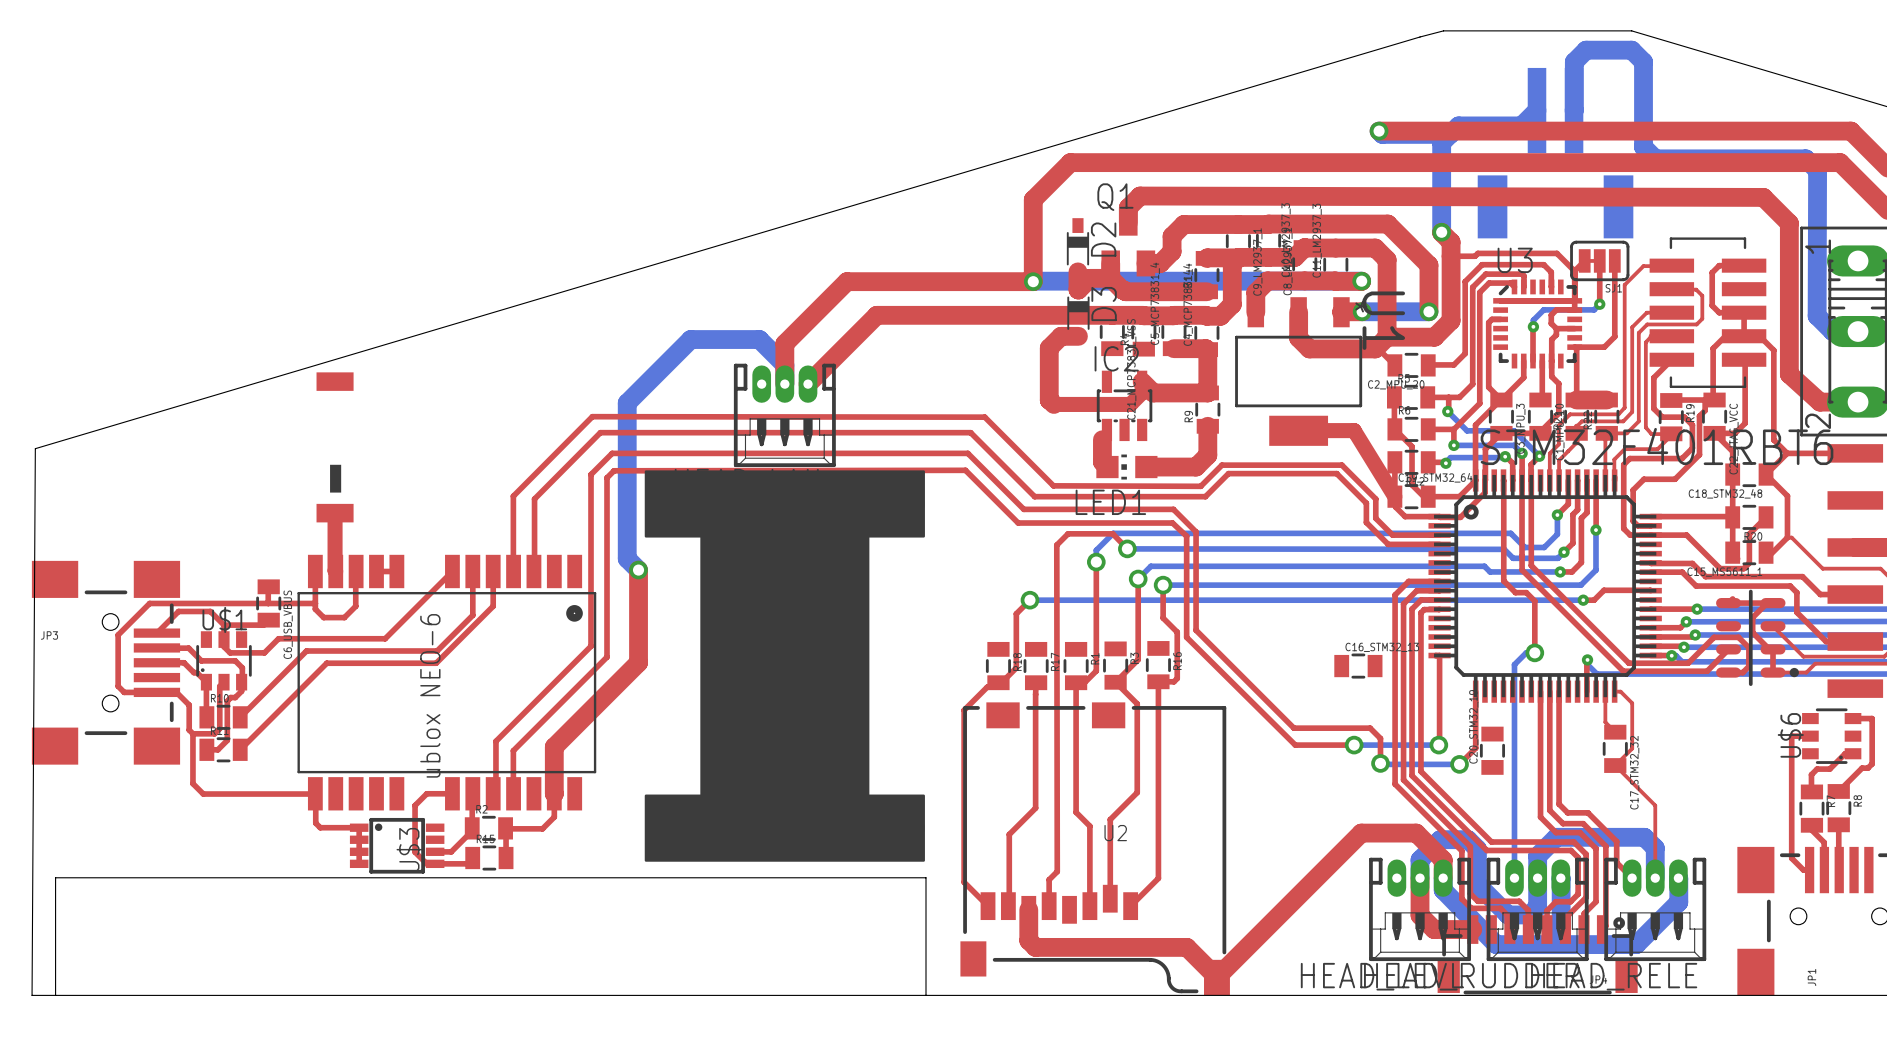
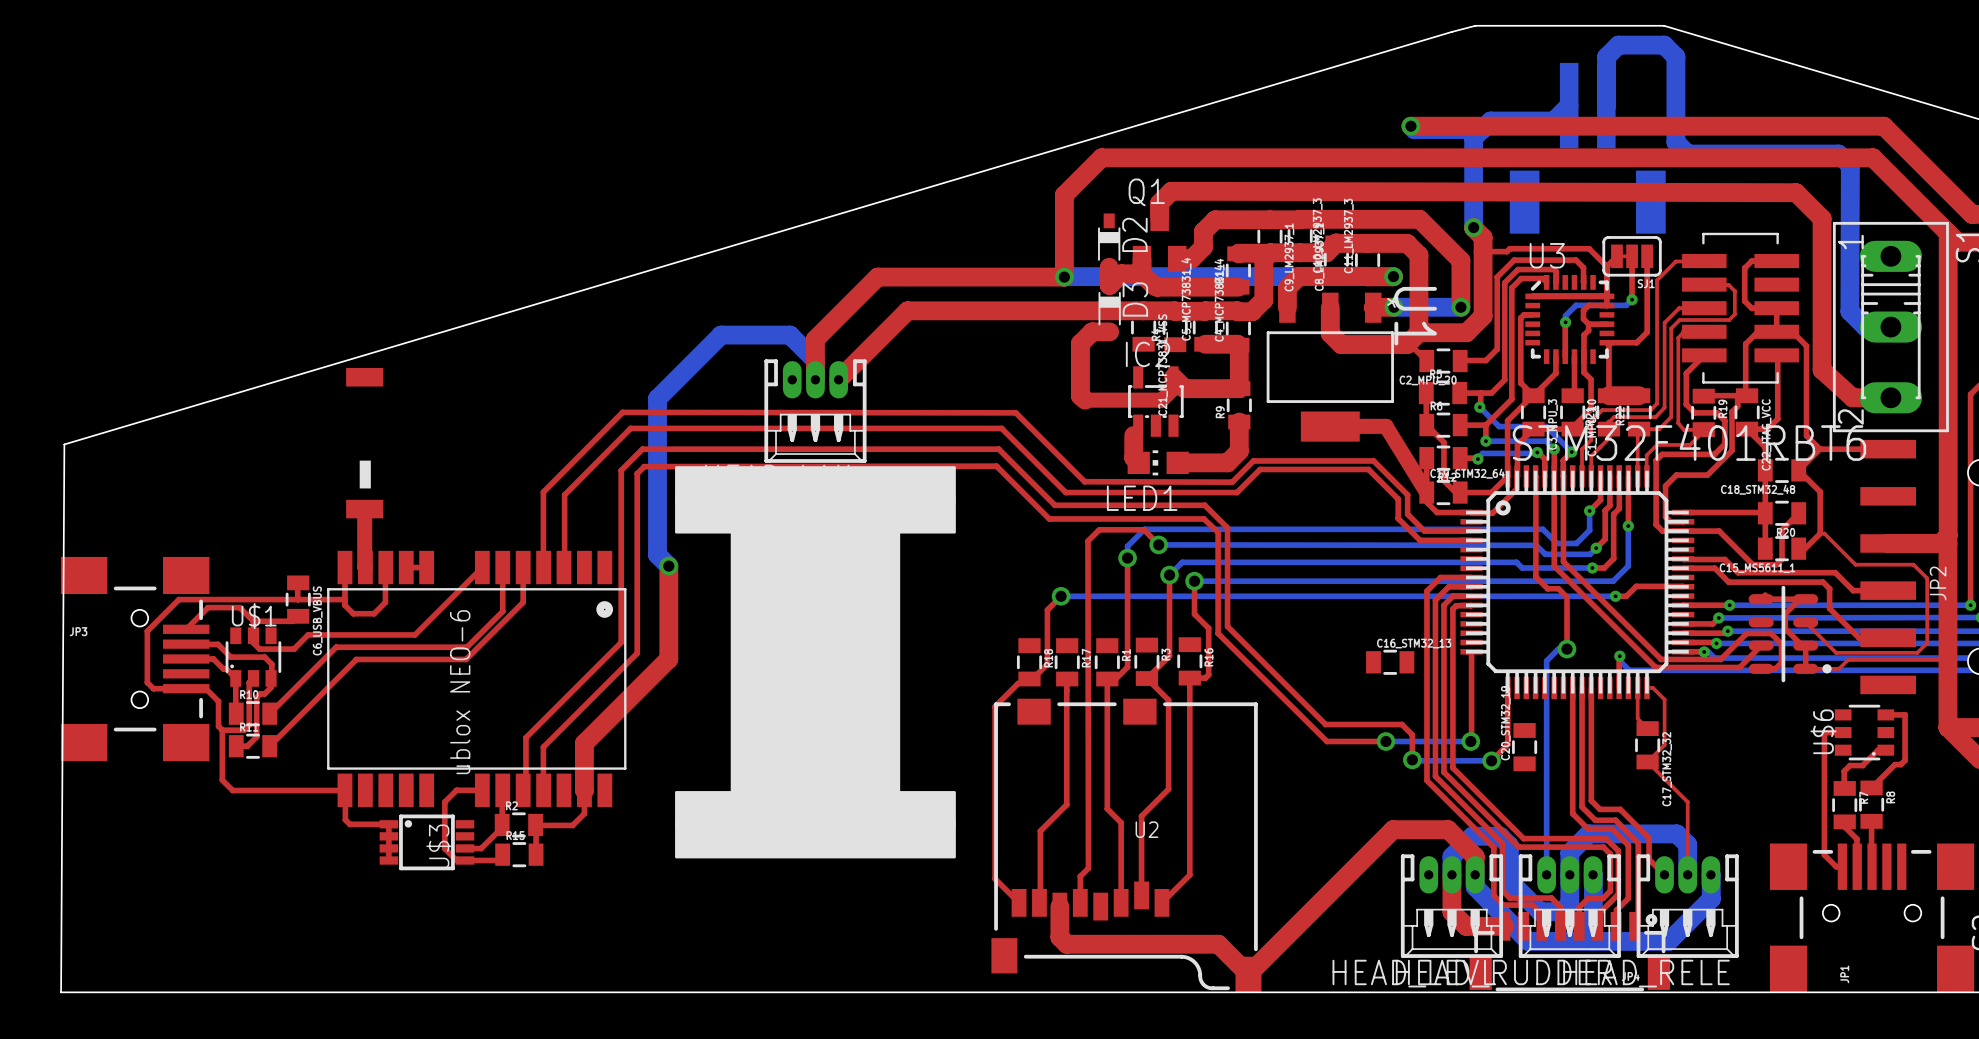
board edge: (55, 995) (55, 877) (926, 877) (926, 995) -> none

